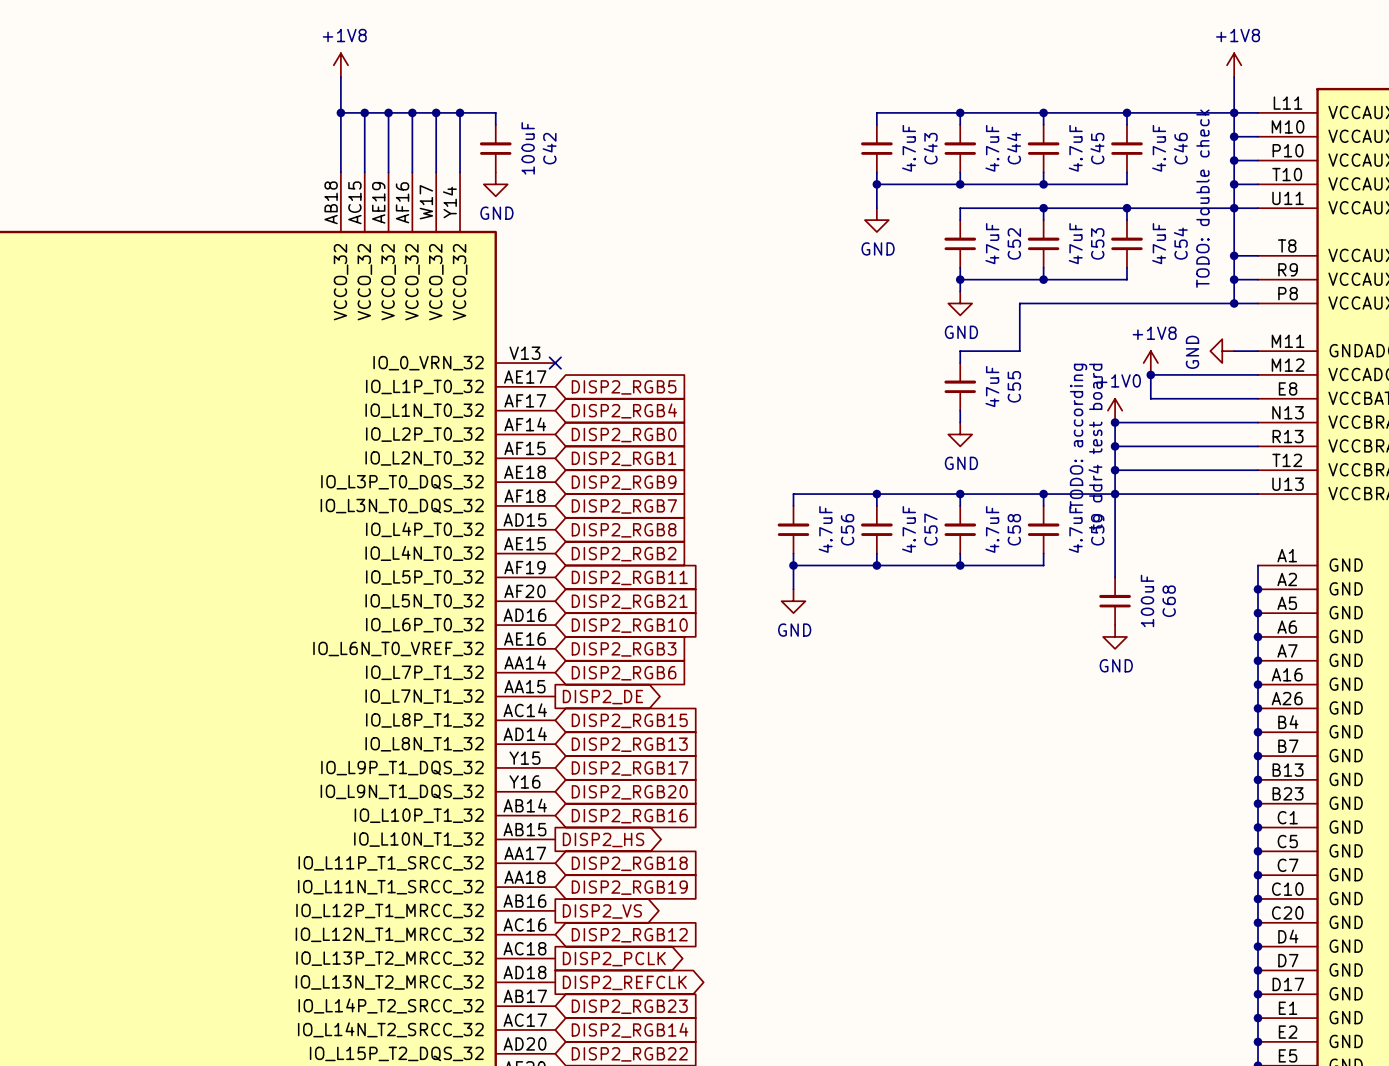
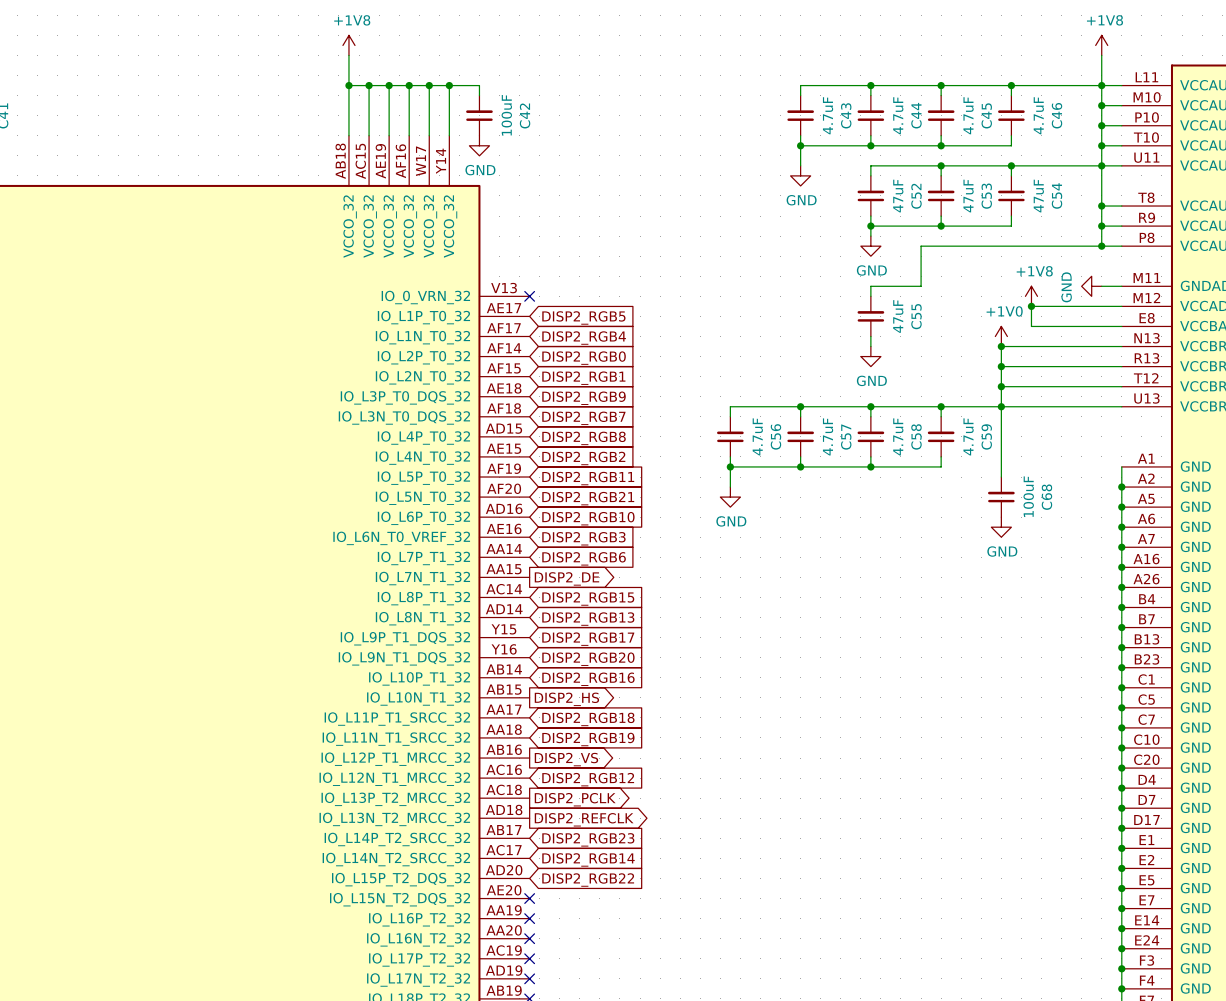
text: TODO: double check (1202, 198) -> none
text: TODO: according (1078, 436) -> none
text: to ddr4 test board (1095, 446) -> none

